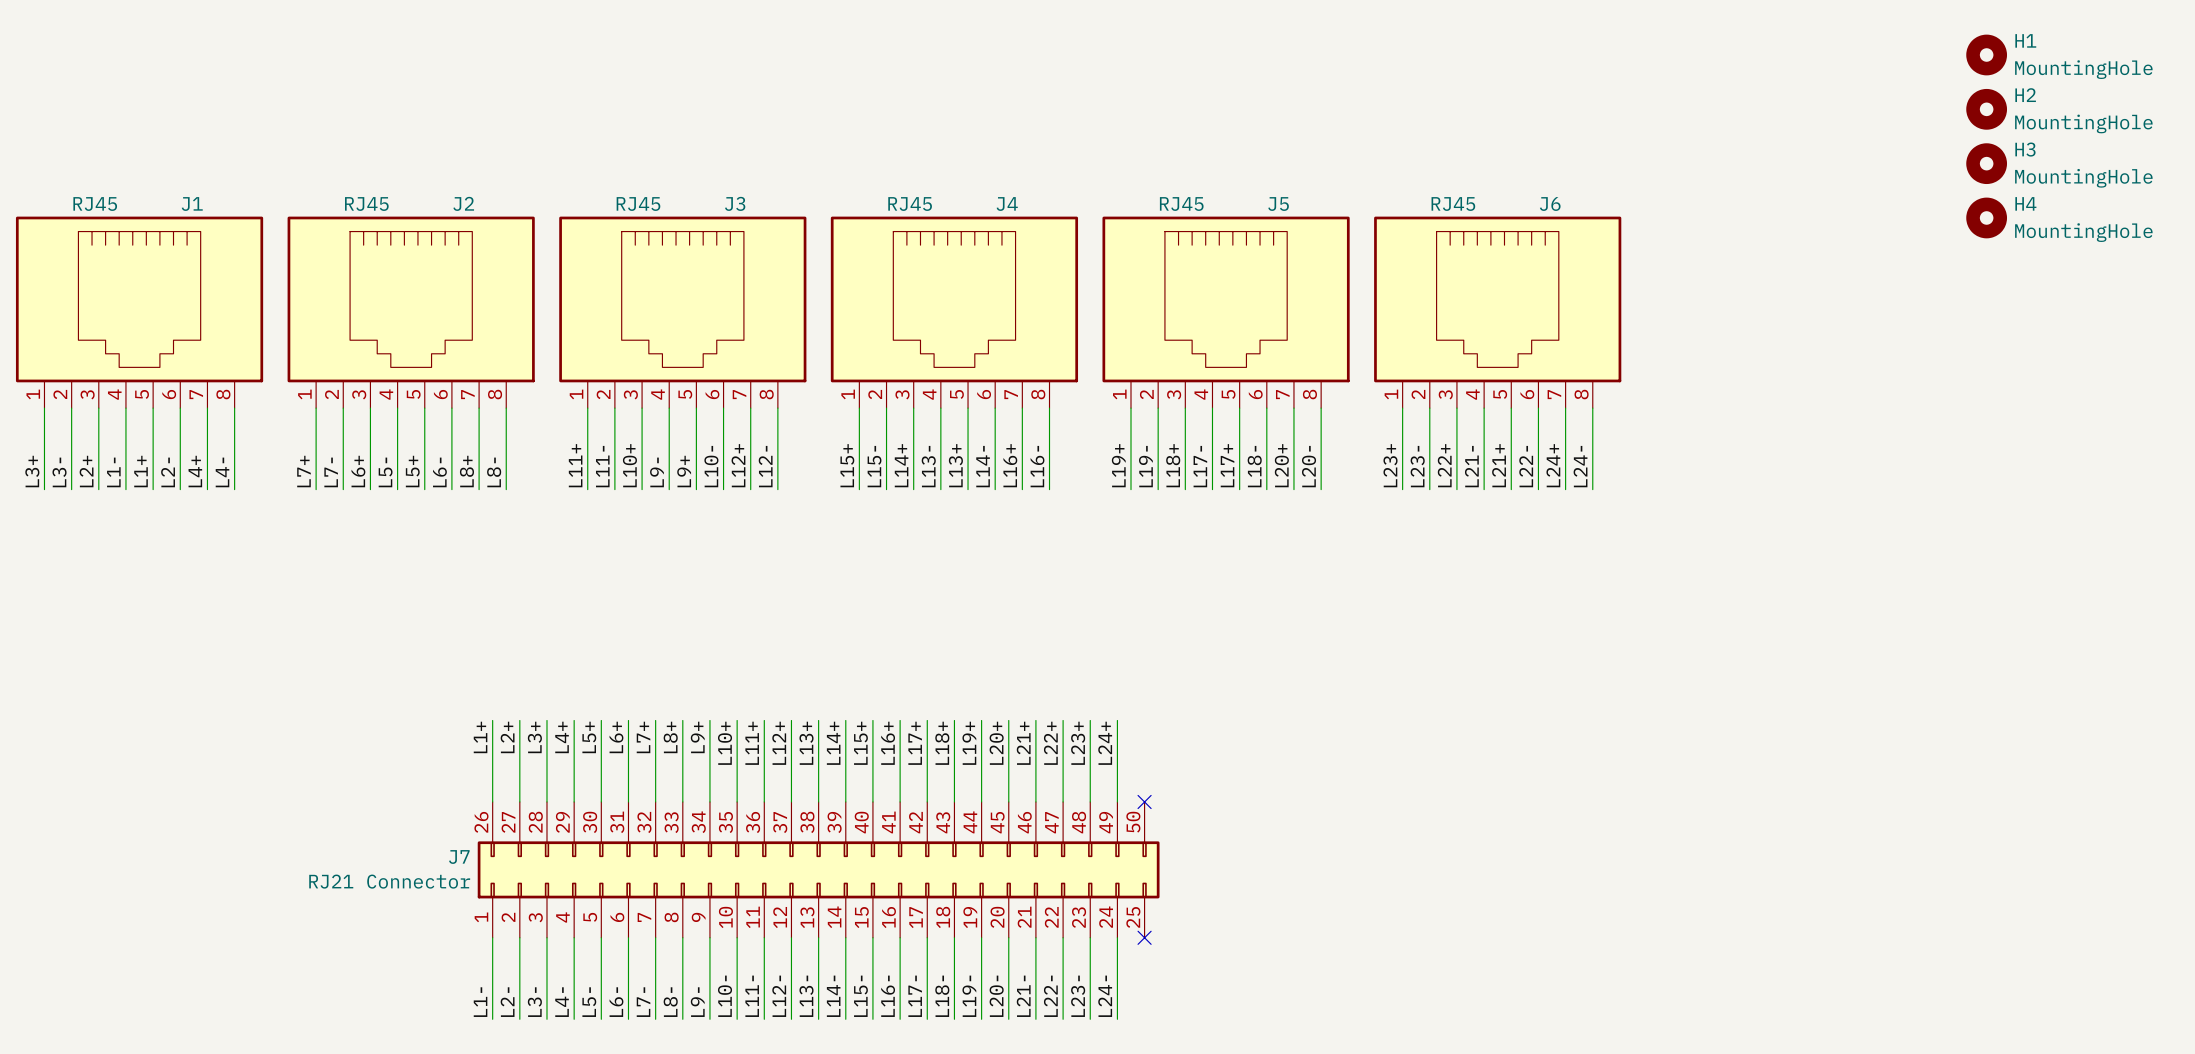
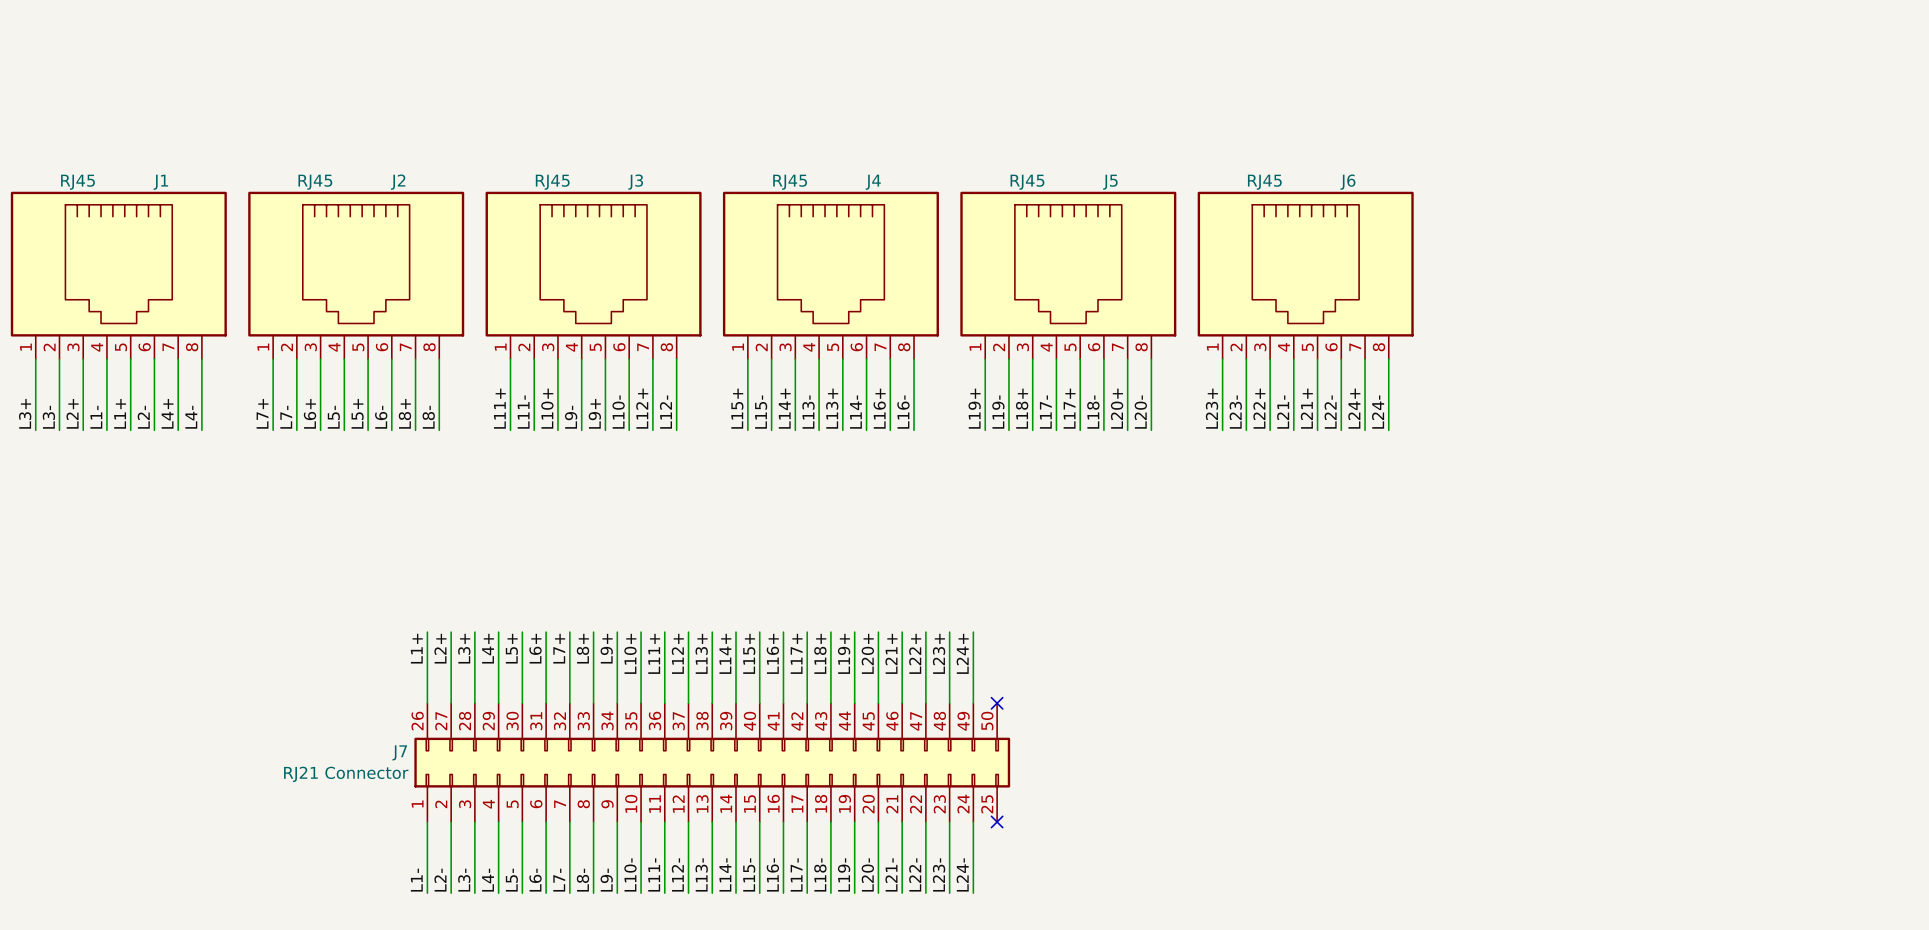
H1: MountingHole (1986, 55) -> none
H2: MountingHole (1986, 109) -> none
H3: MountingHole (1986, 163) -> none
H4: MountingHole (1986, 217) -> none

